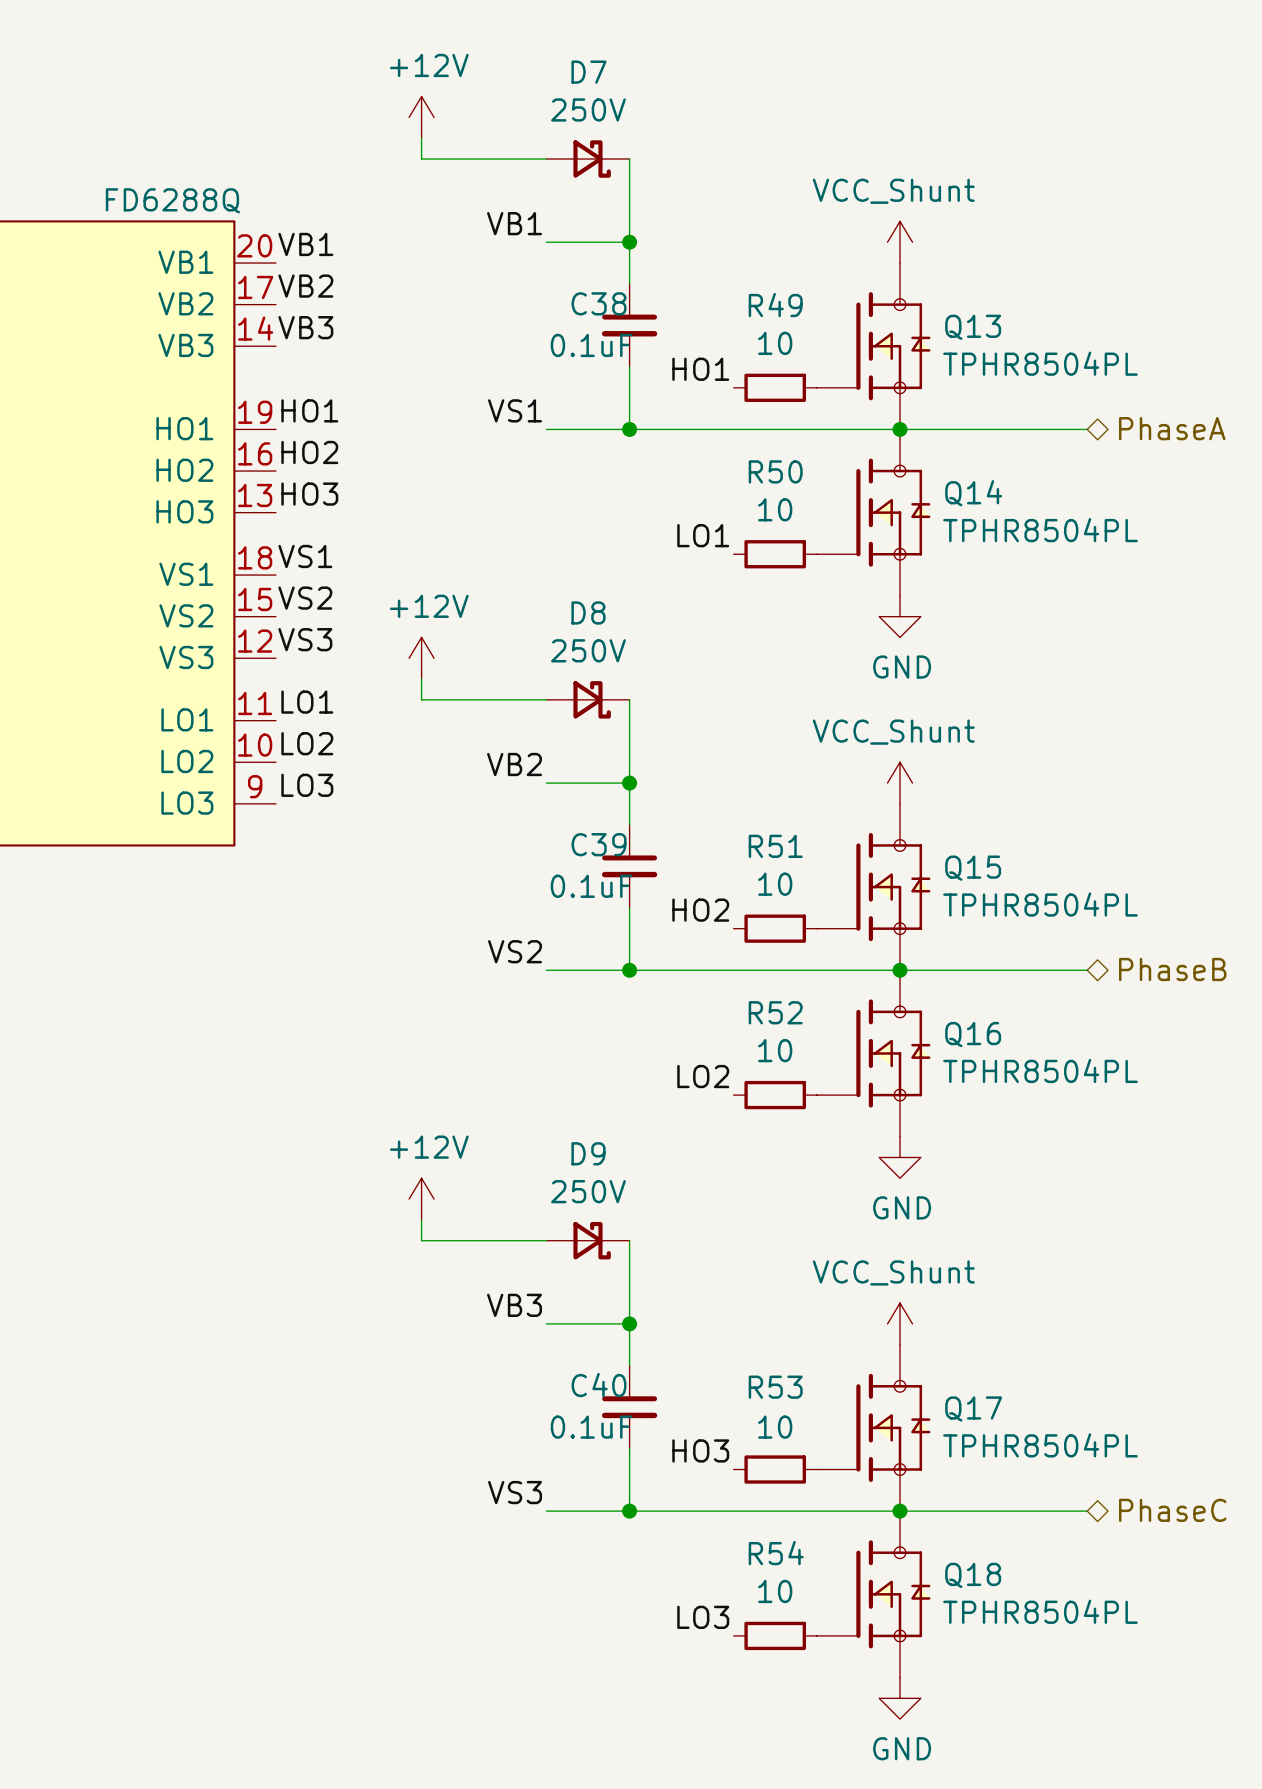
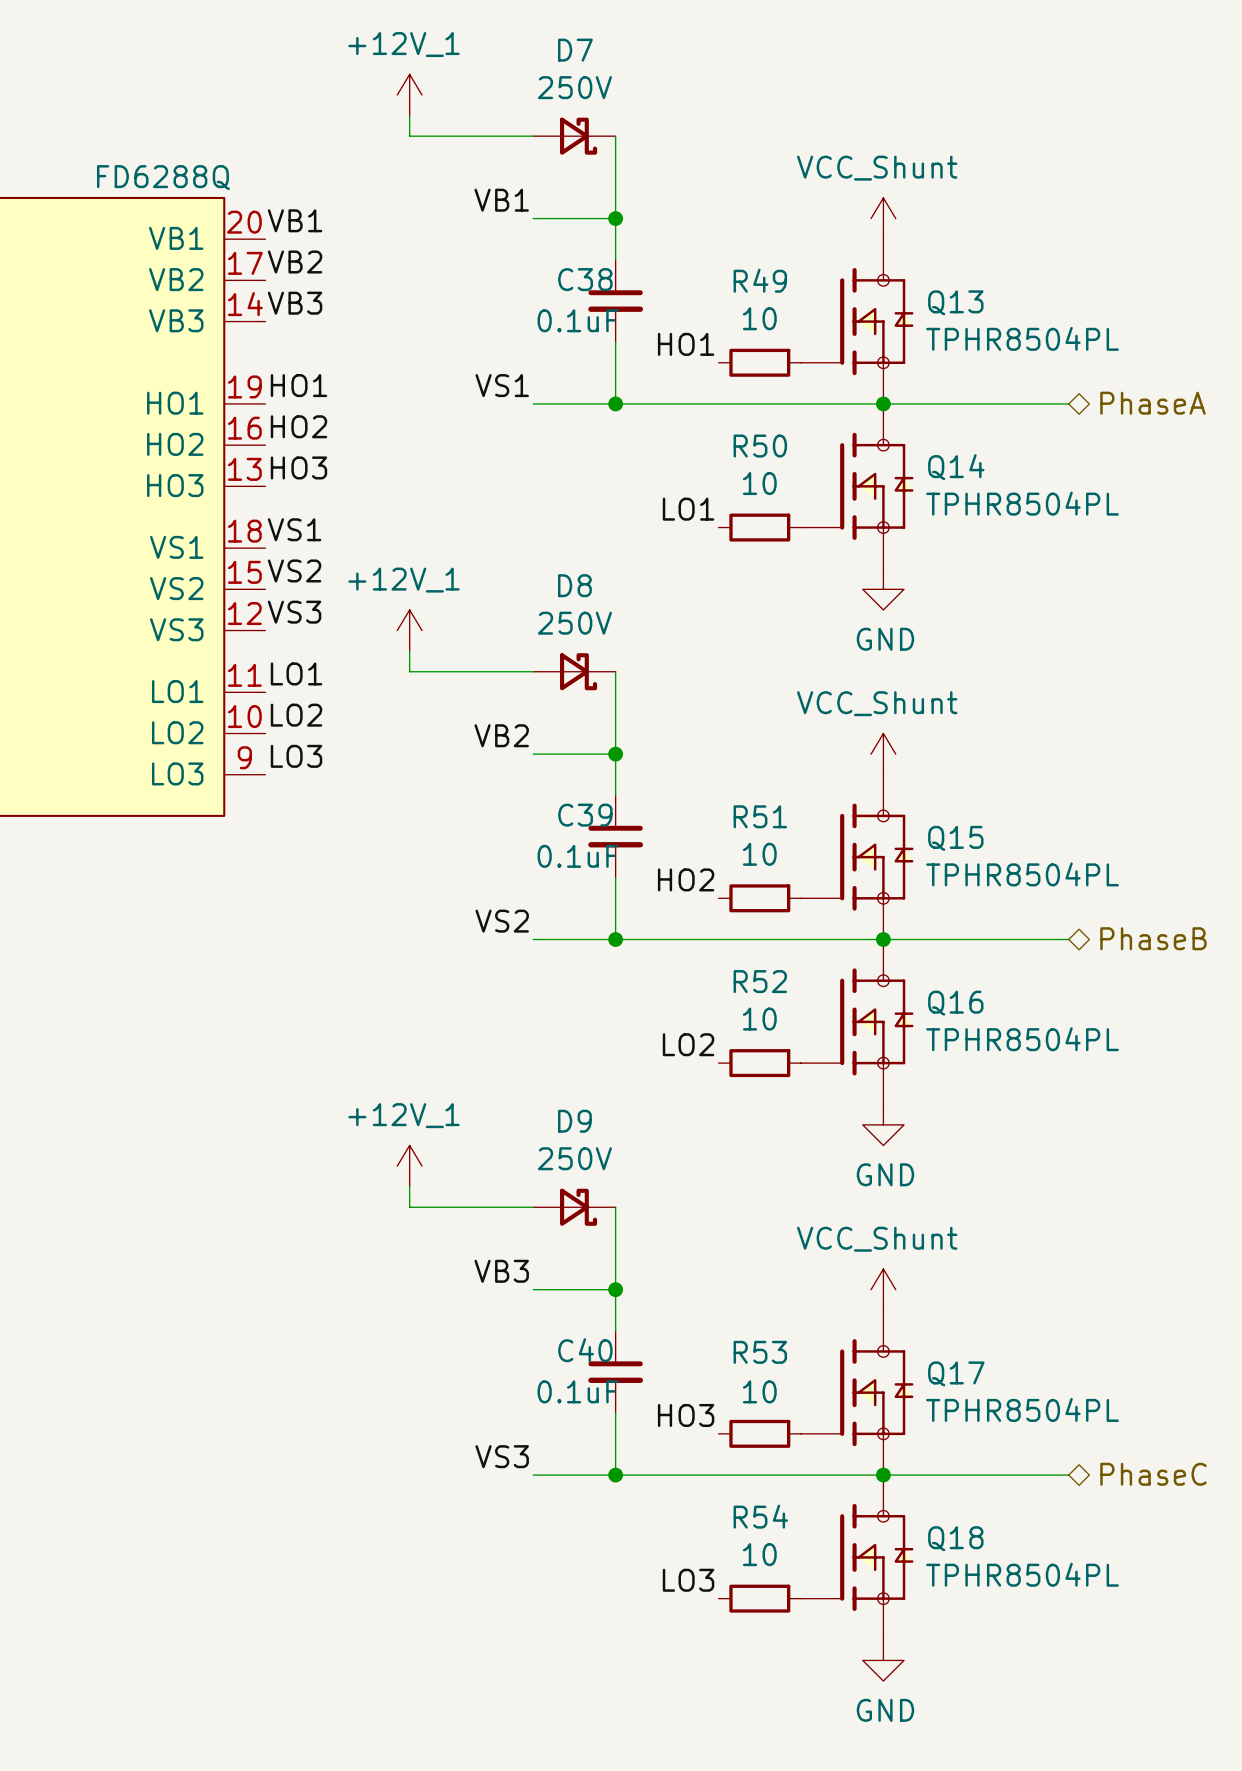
power symbol: +12V (421, 117) -> +12V_1 (409, 94)
power symbol: +12V (421, 658) -> +12V_1 (409, 630)
power symbol: +12V (421, 1199) -> +12V_1 (409, 1166)

